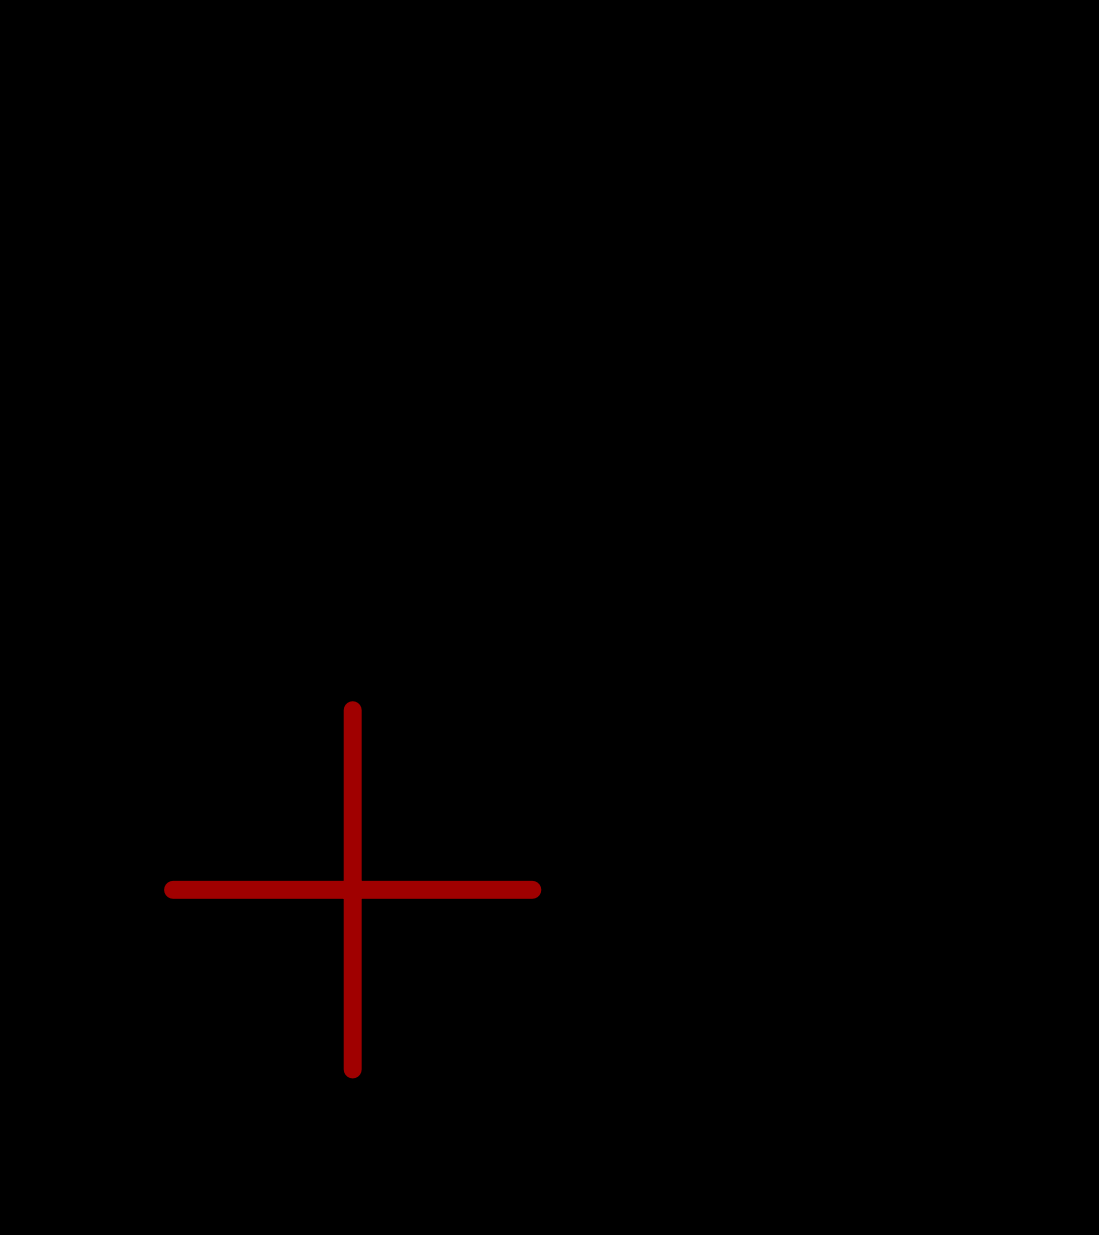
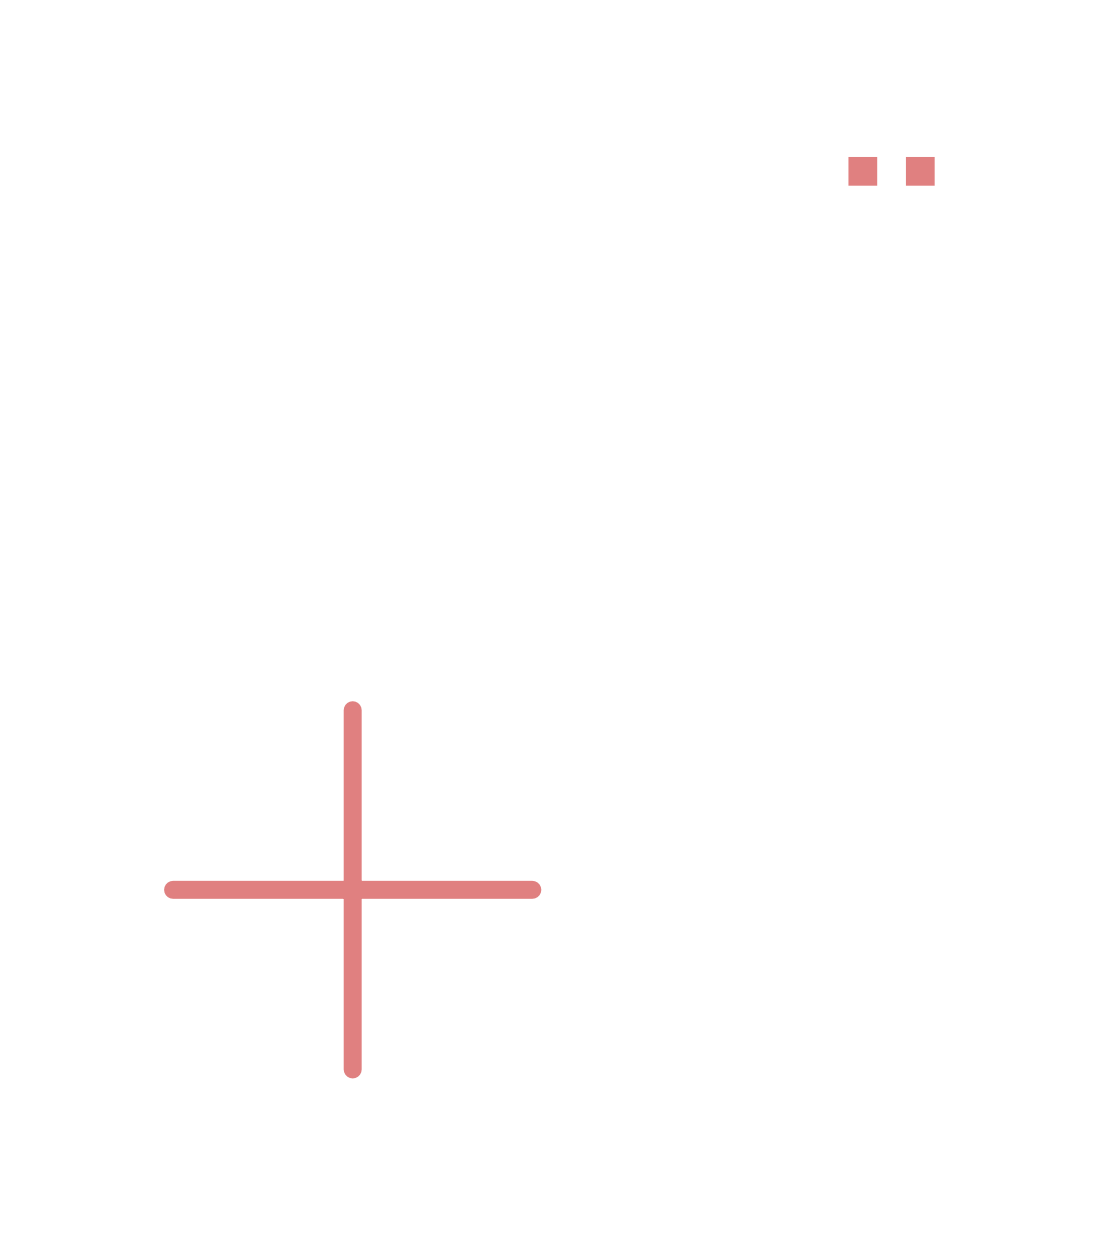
part: none -> (891, 171)

